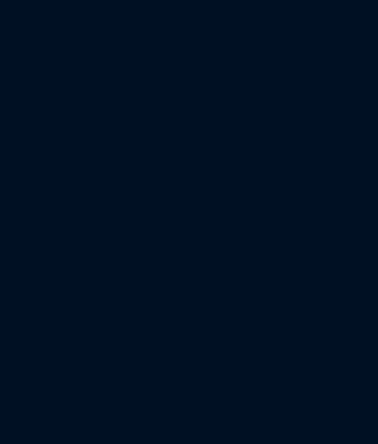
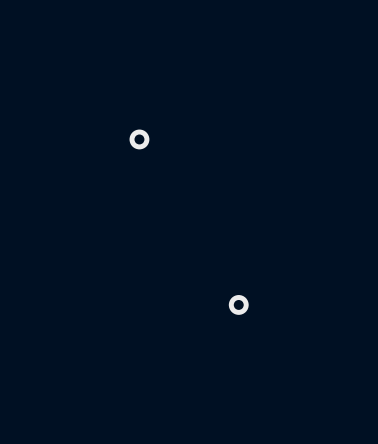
via: none -> (139, 139)
via: none -> (238, 304)

